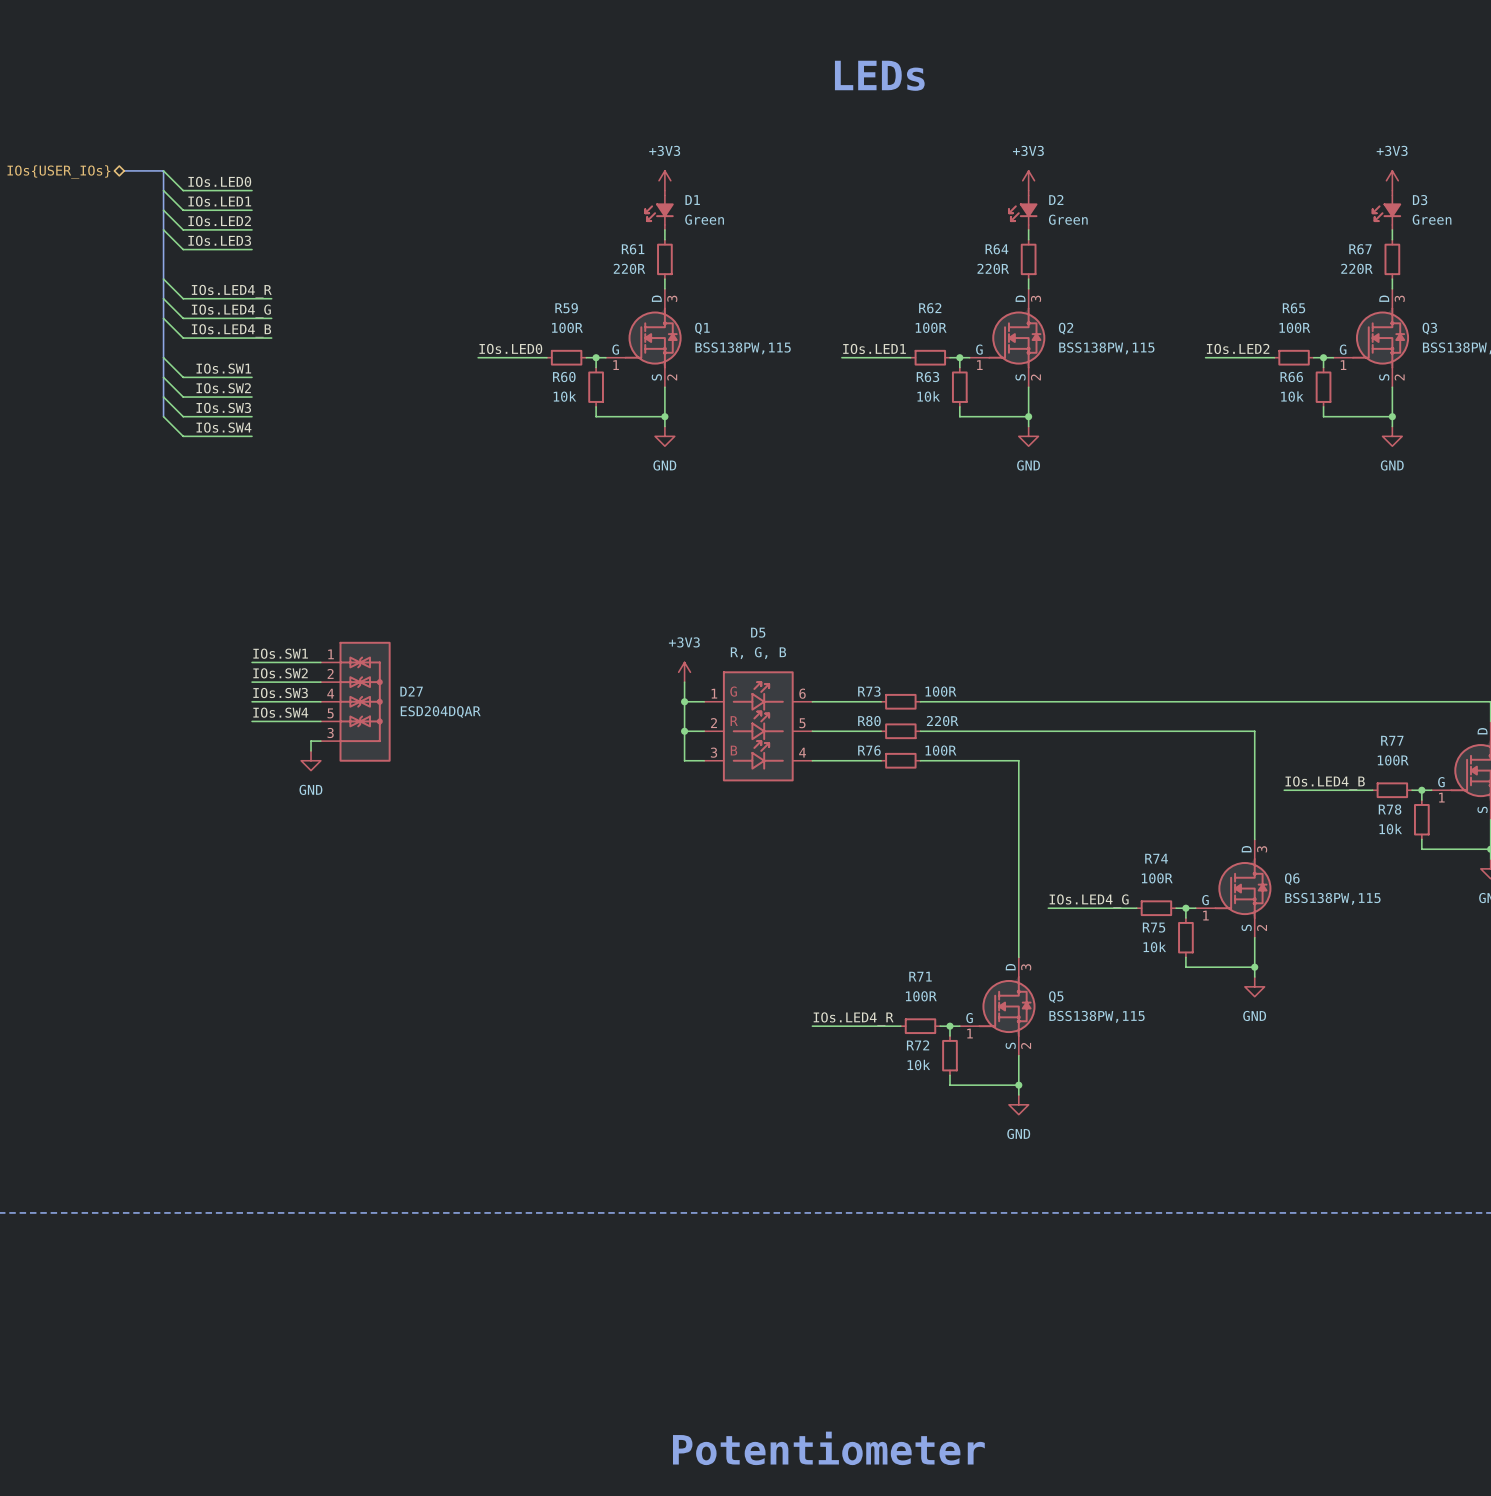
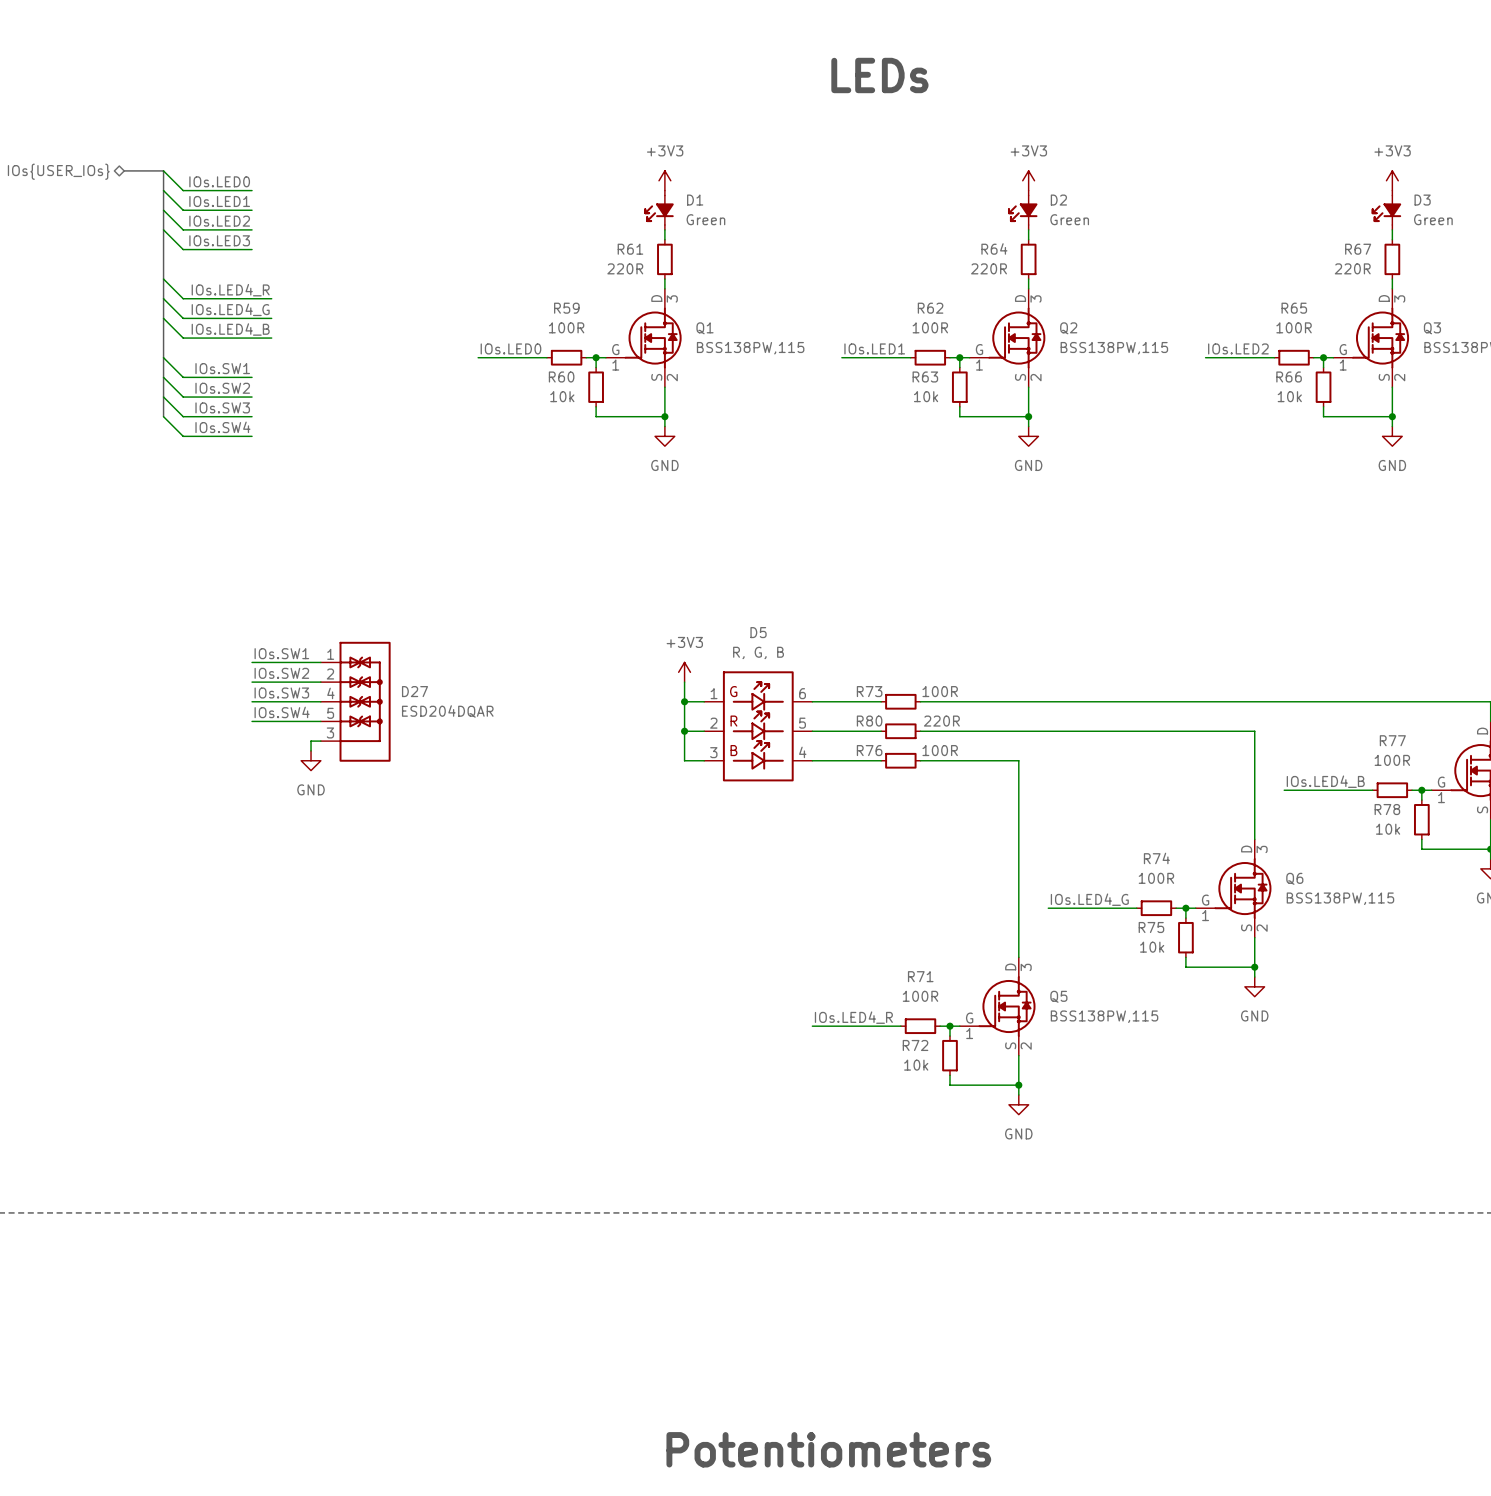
text: Potentiometer (828, 1448) -> Potentiometers (828, 1449)

